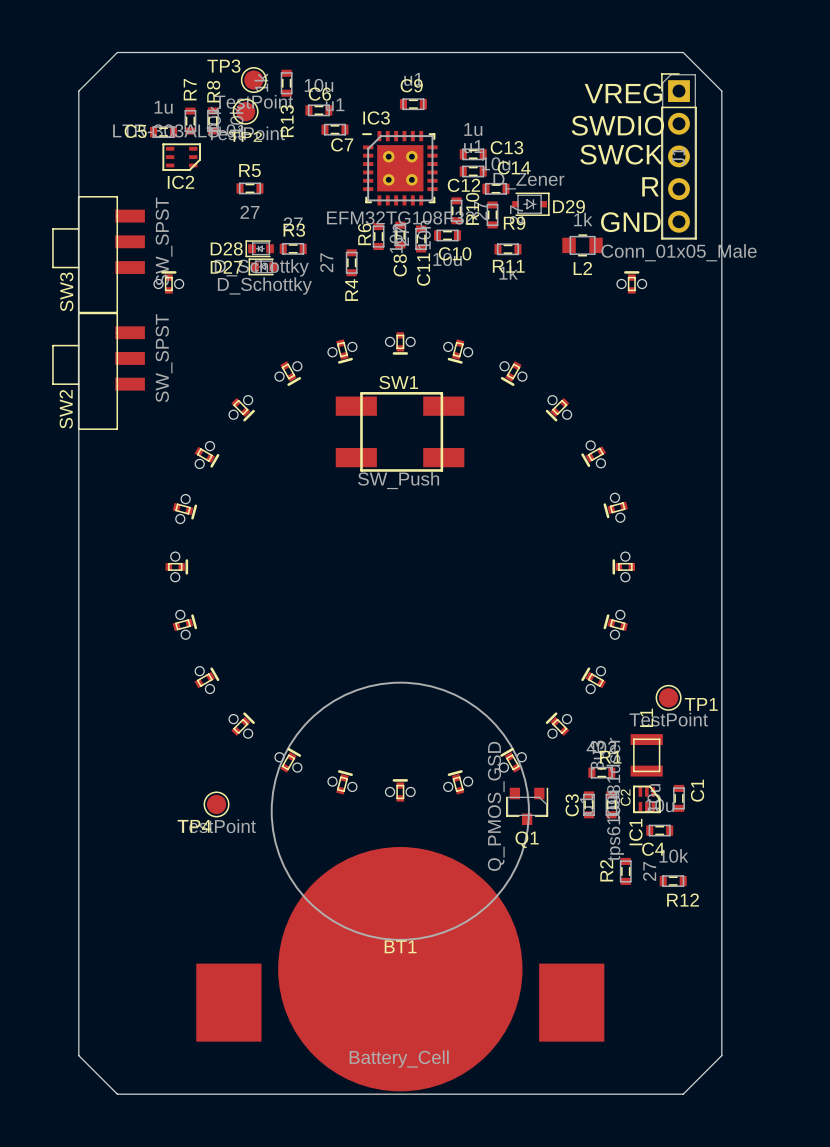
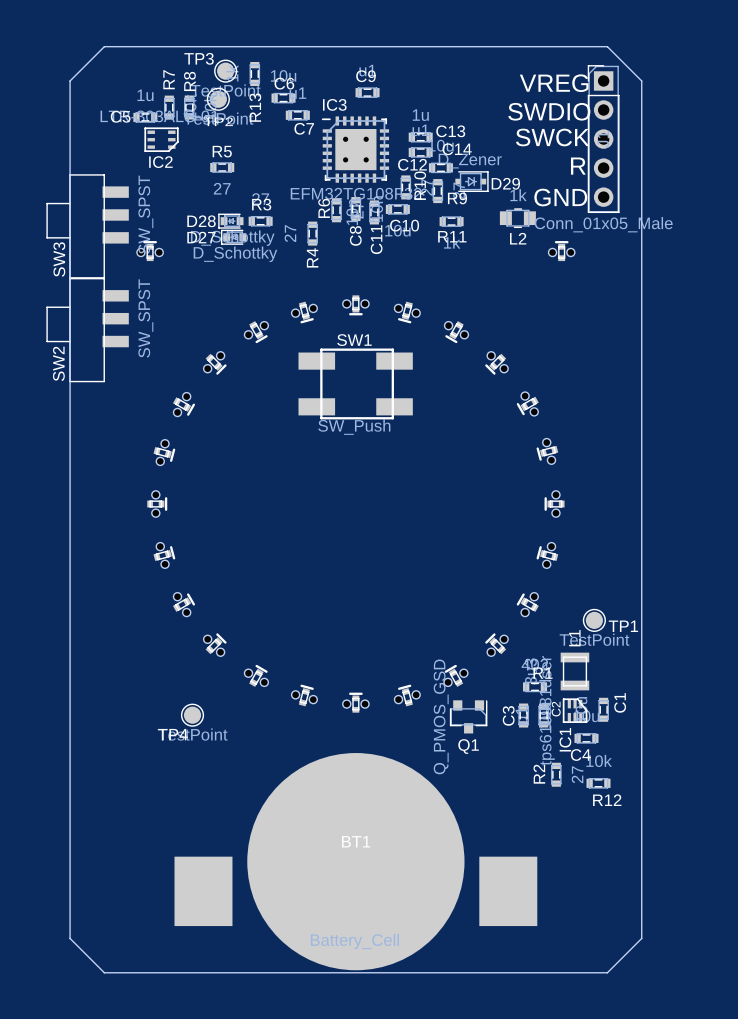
drawing: [270, 681, 530, 941] -> none

